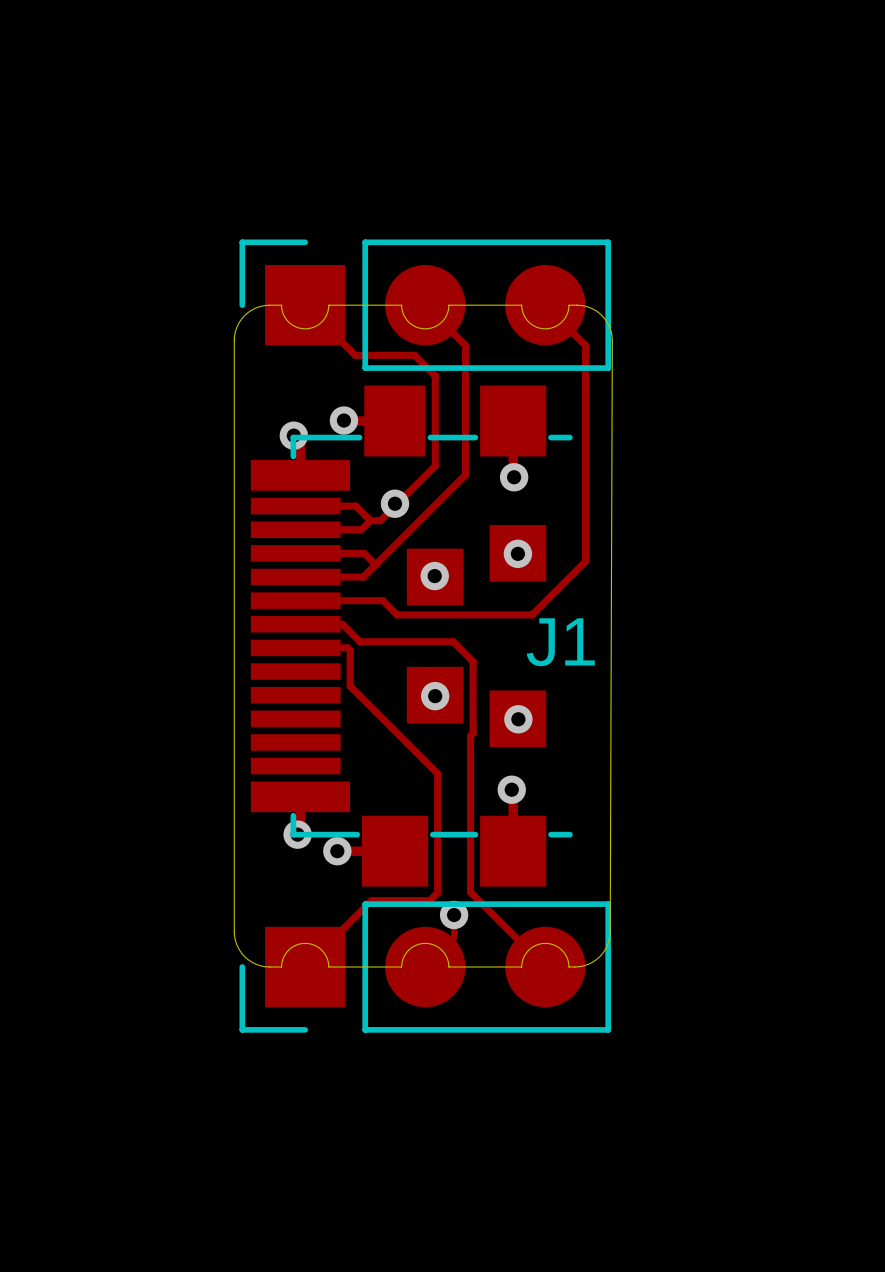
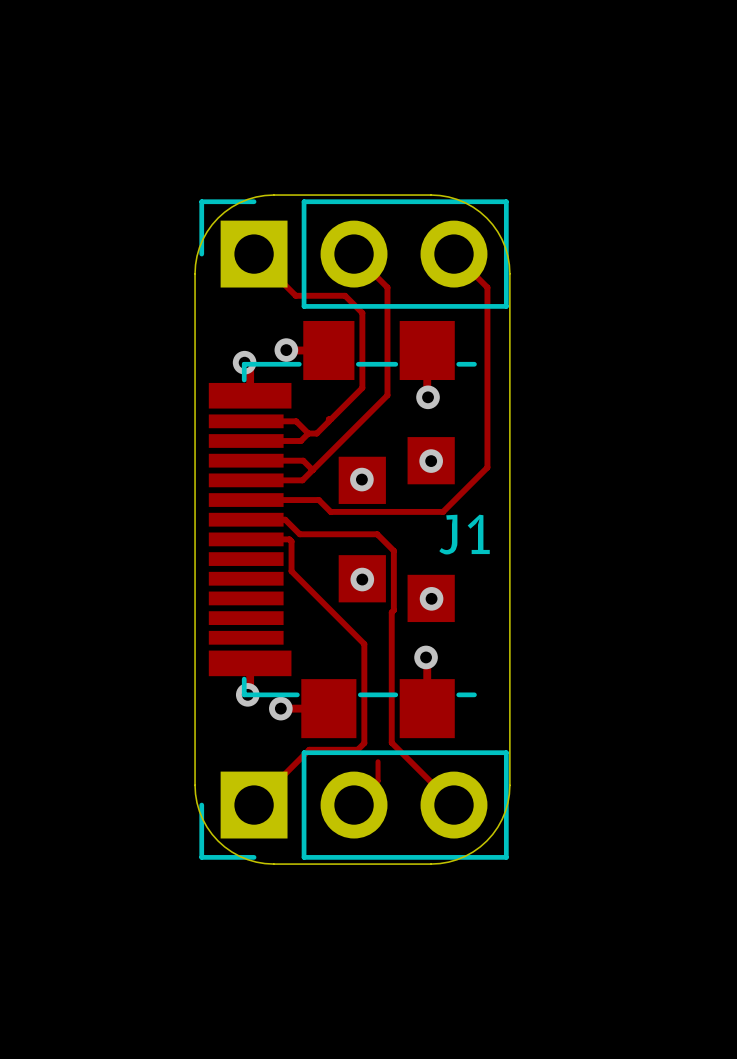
part footprint: [239, 239, 612, 371] -> [199, 199, 509, 309]
board edge: (234, 340) (236, 327) (244, 315) (252, 309) (265, 305) (281, 305) (283, 314) (288, 321) (296, 327) (305, 328) (314, 327) (321, 321) (327, 314) (328, 305) (401, 305) (403, 314) (408, 321) (416, 327) (425, 328) (434, 327) (441, 321) (447, 314) (448, 305) (521, 305) (523, 314) (528, 321) (536, 327) (545, 328) (554, 327) (562, 321) (567, 314) (568, 305) (576, 305) (588, 307) (601, 315) (608, 325) (612, 340) (610, 931) (605, 949) (592, 962) (579, 966) (568, 967) (567, 957) (562, 950) (554, 945) (545, 943) (536, 945) (528, 950) (523, 957) (521, 967) (448, 967) (447, 957) (441, 950) (434, 945) (425, 943) (416, 945) (408, 950) (403, 957) (401, 967) (328, 967) (327, 957) (321, 950) (314, 945) (305, 943) (296, 945) (288, 950) (283, 957) (281, 967) (269, 967) (256, 964) (244, 956) (236, 945) (234, 931) -> (195, 283) (195, 264) (199, 247) (212, 224) (224, 212) (239, 202) (256, 197) (273, 195) (431, 195) (457, 199) (473, 207) (492, 224) (505, 247) (509, 273) (509, 785) (507, 802) (497, 827) (486, 841) (473, 852) (457, 859) (439, 863) (273, 864) (256, 862) (231, 852) (218, 841) (207, 827) (197, 802) (195, 775)
via: (395, 503) -> none
part footprint: [239, 901, 612, 1033] -> [199, 750, 509, 860]
via: (454, 915) -> none

